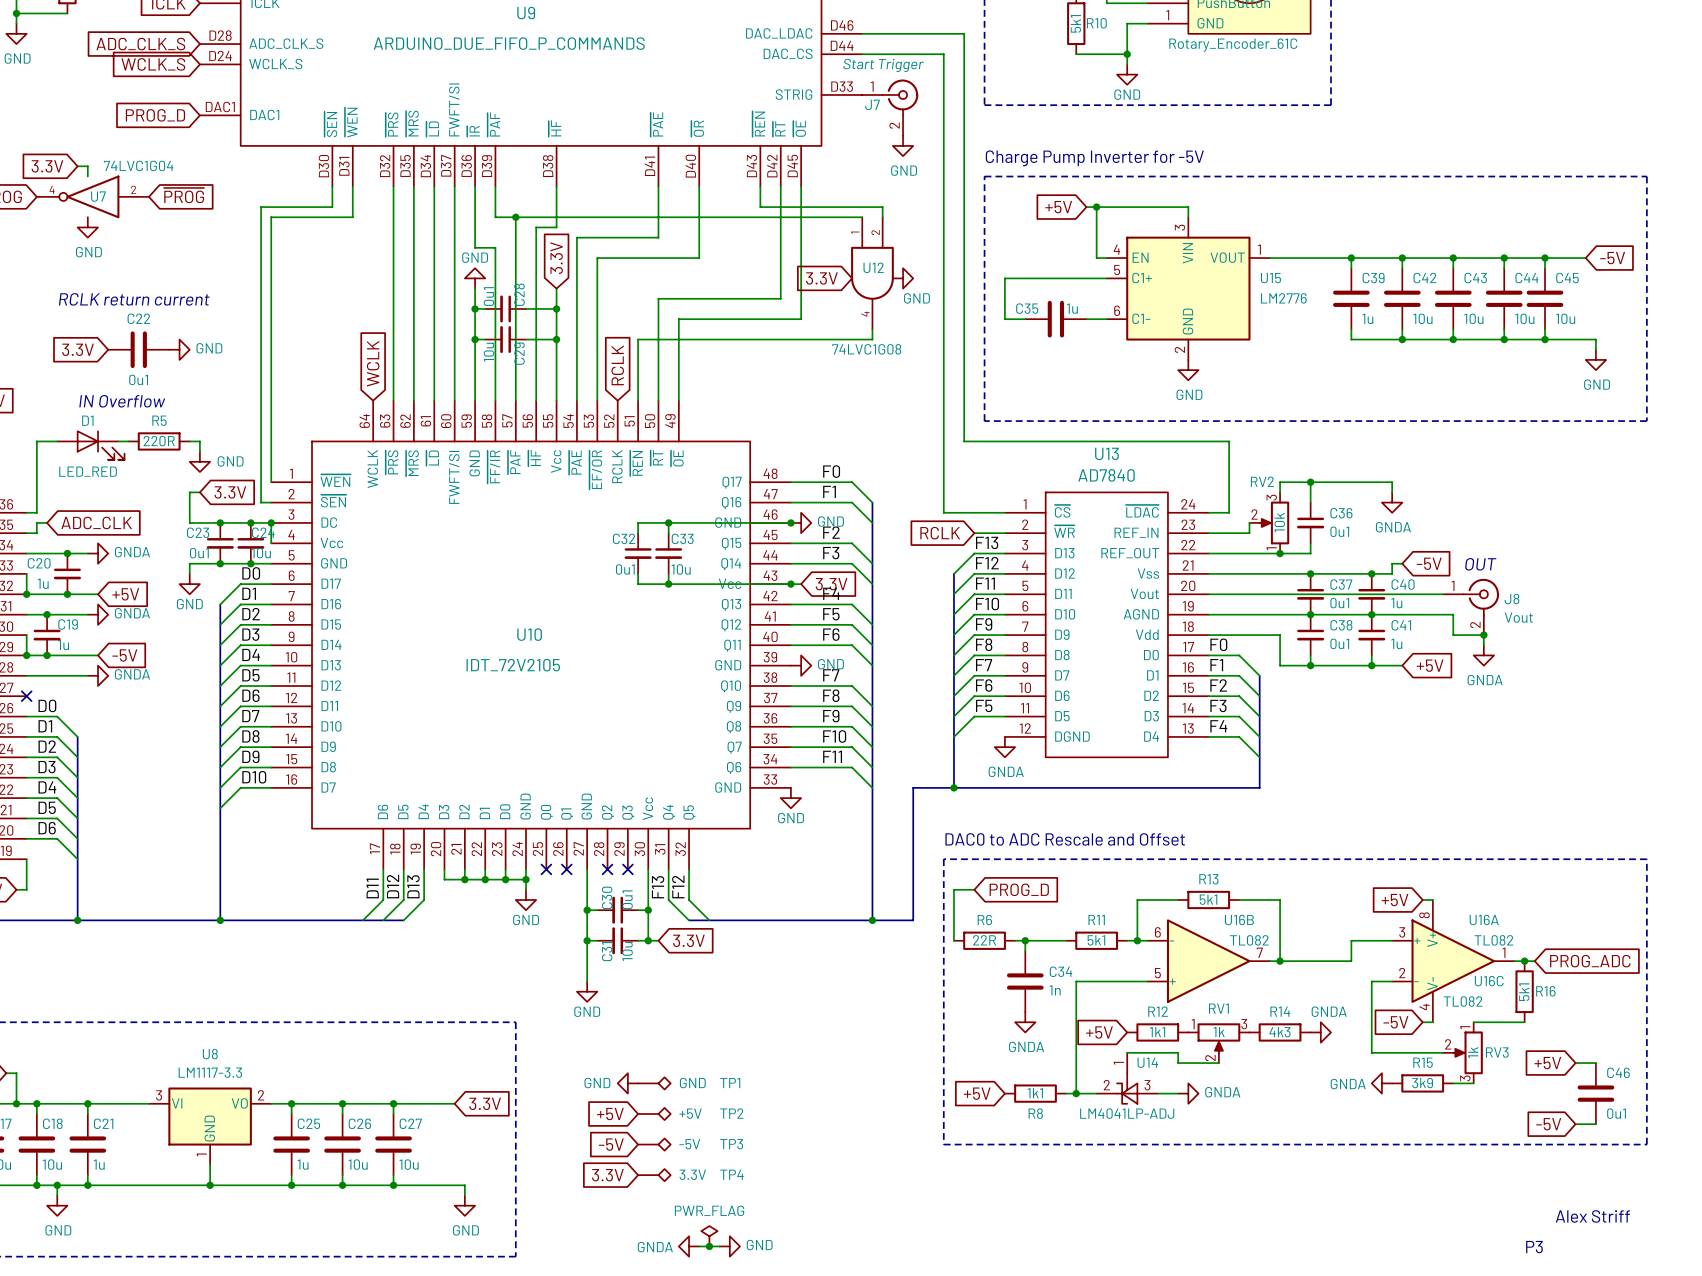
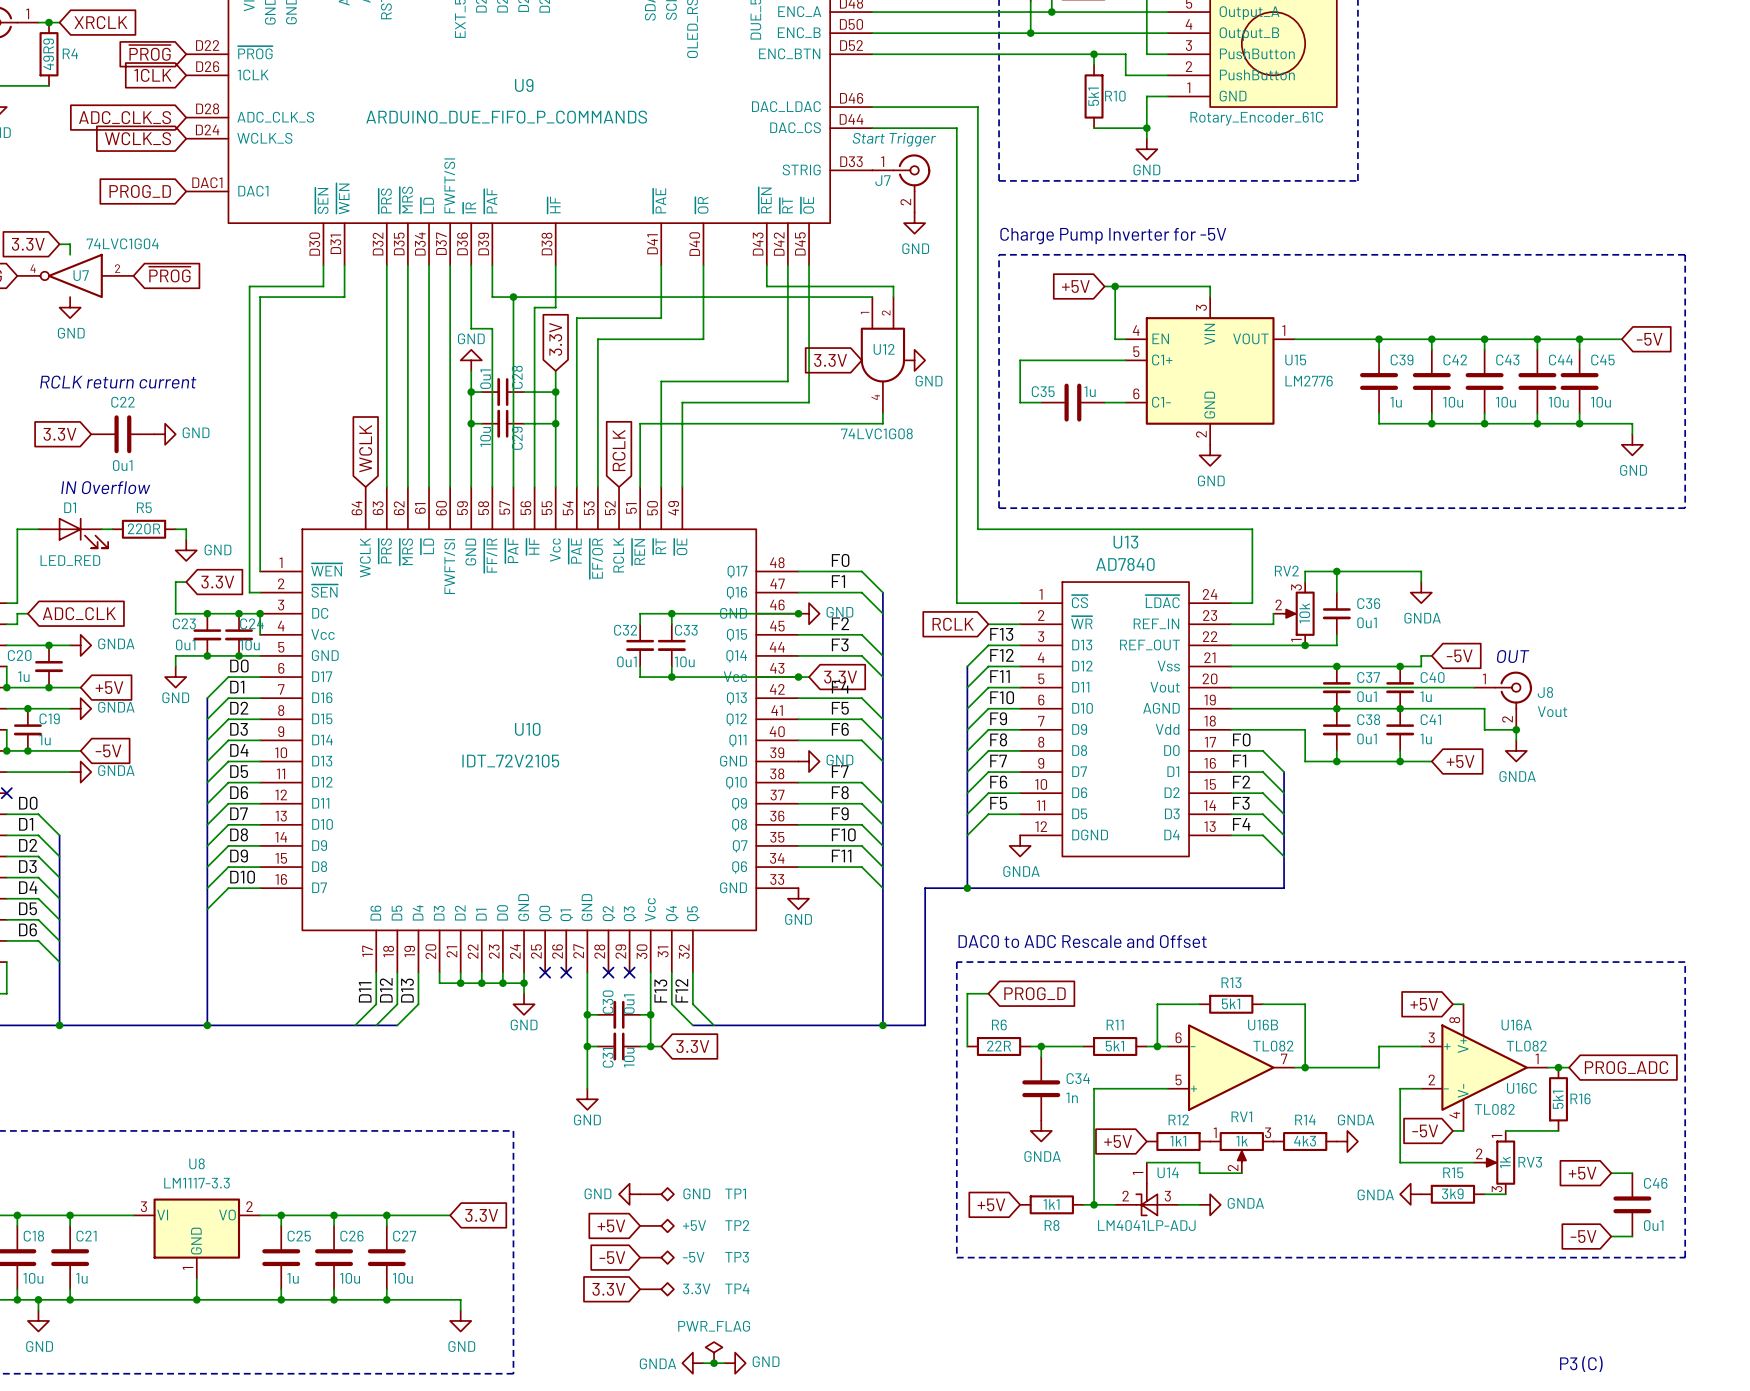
text: Alex Striff (1592, 1216) -> none
text: P3 (1534, 1247) -> P3 (C) (1581, 1364)

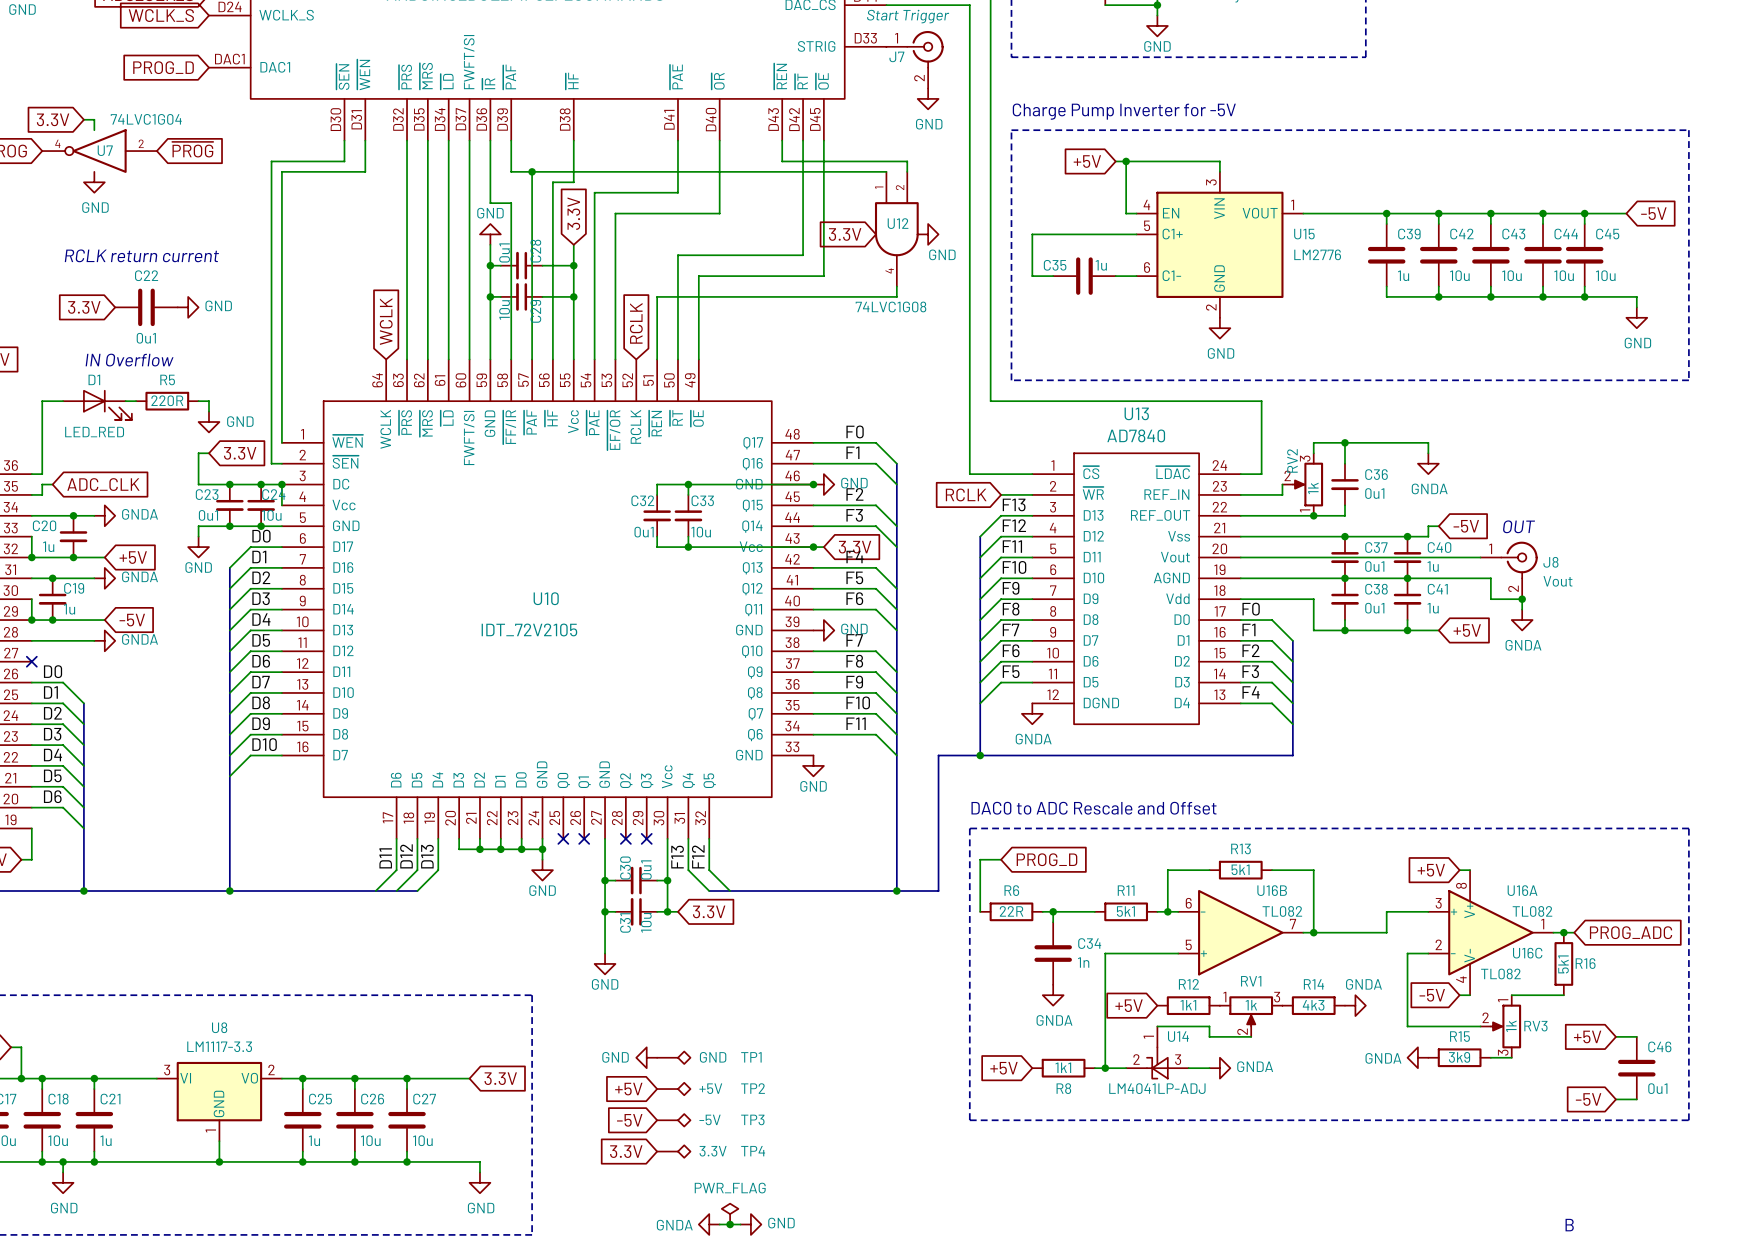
RV2 name rotation: 0° (1286, 571) -> 90° counterclockwise (1292, 460)
RV2 value: 10k (1304, 613) -> 1k (1313, 488)
text: P3 (C) (1581, 1364) -> B (1569, 1225)

